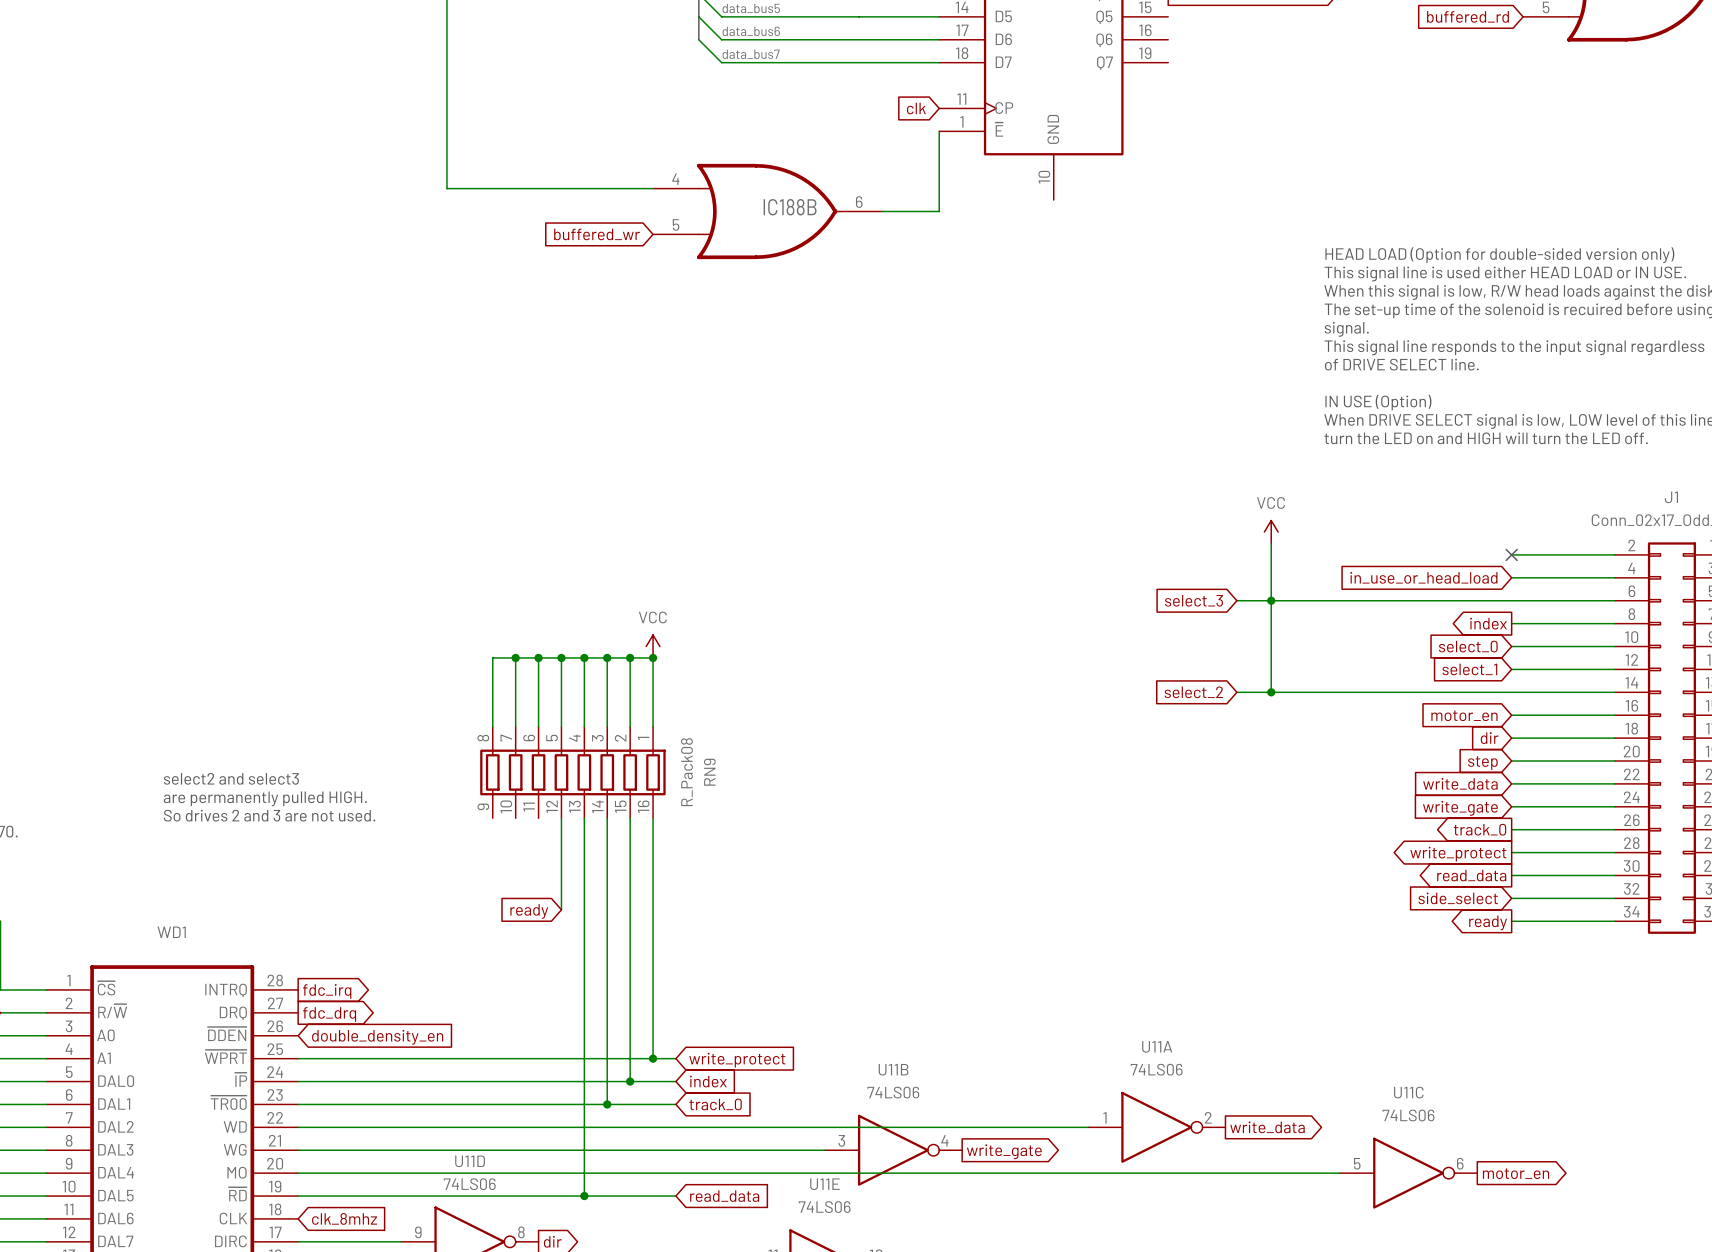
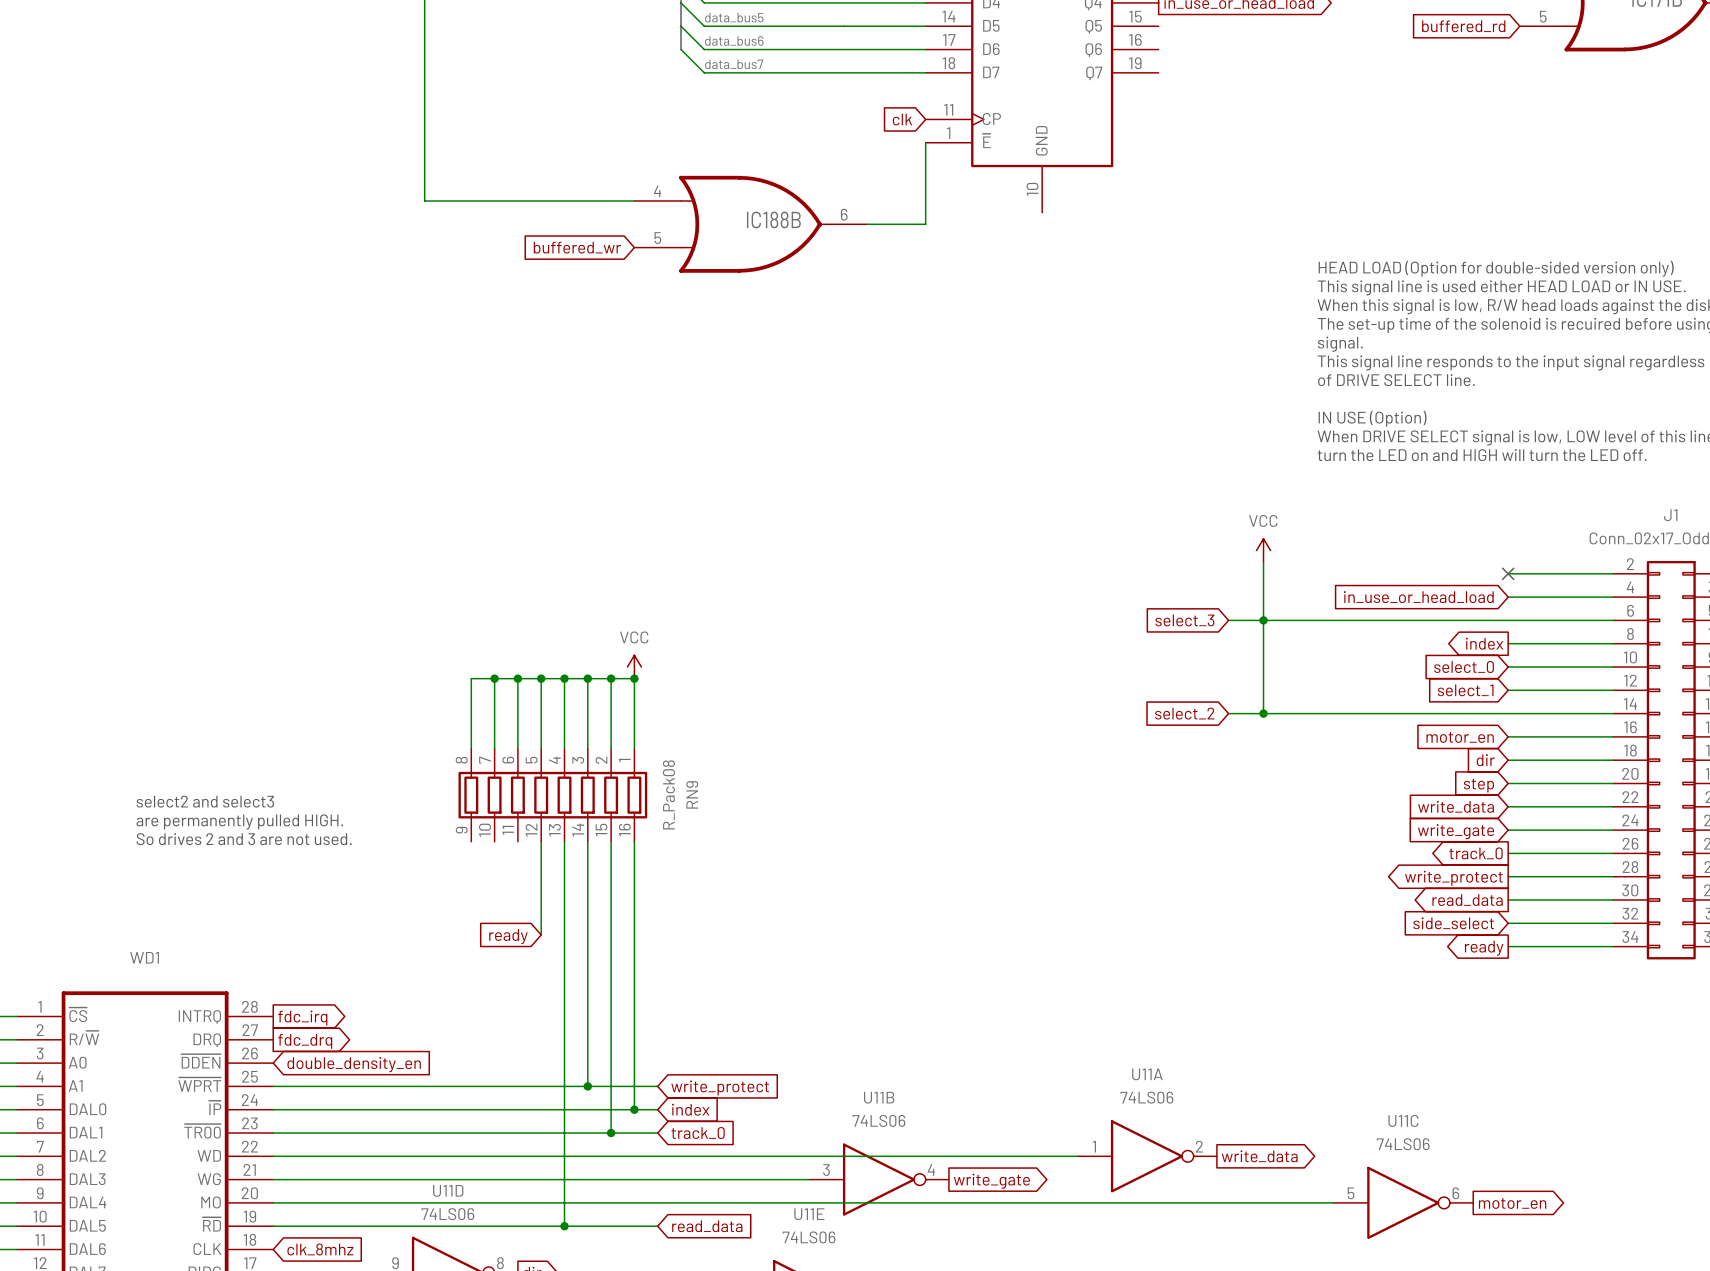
wire: (607, 1058) (607, 1104) -> none
junction: none -> (587, 1086)
wire: none -> (634, 1086) (634, 1109)
junction: (653, 1058) -> none
wire: none -> (611, 1109) (611, 1133)
junction: (630, 1081) -> none
junction: none -> (634, 1109)
junction: (607, 1104) -> none
junction: none -> (611, 1133)

